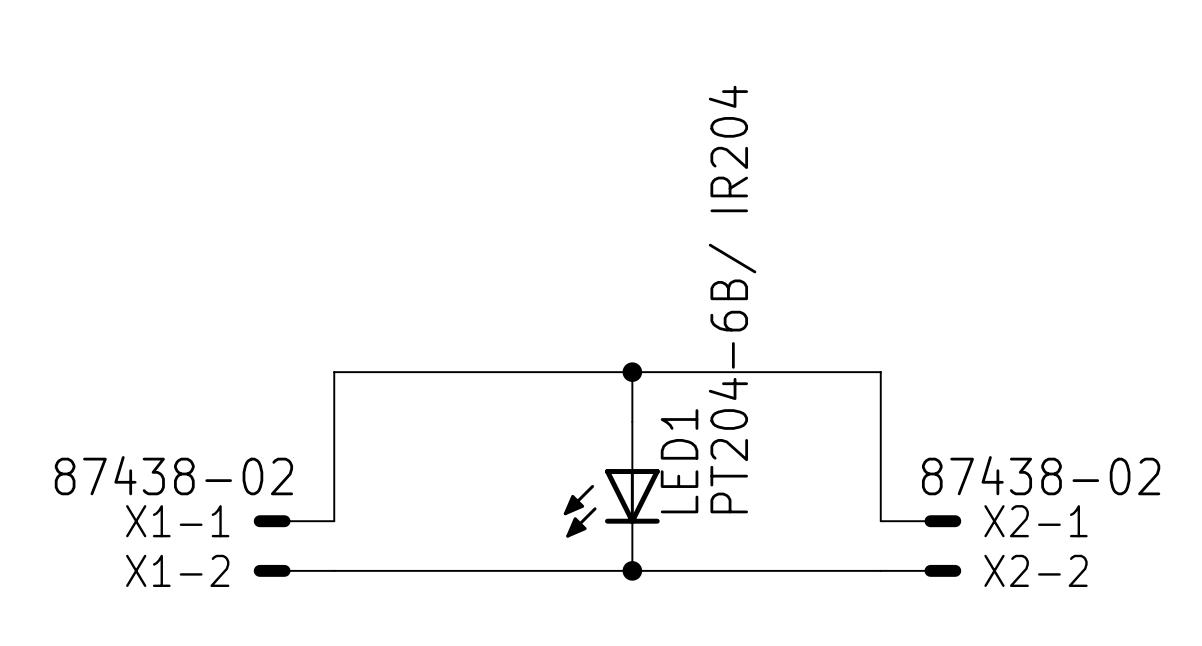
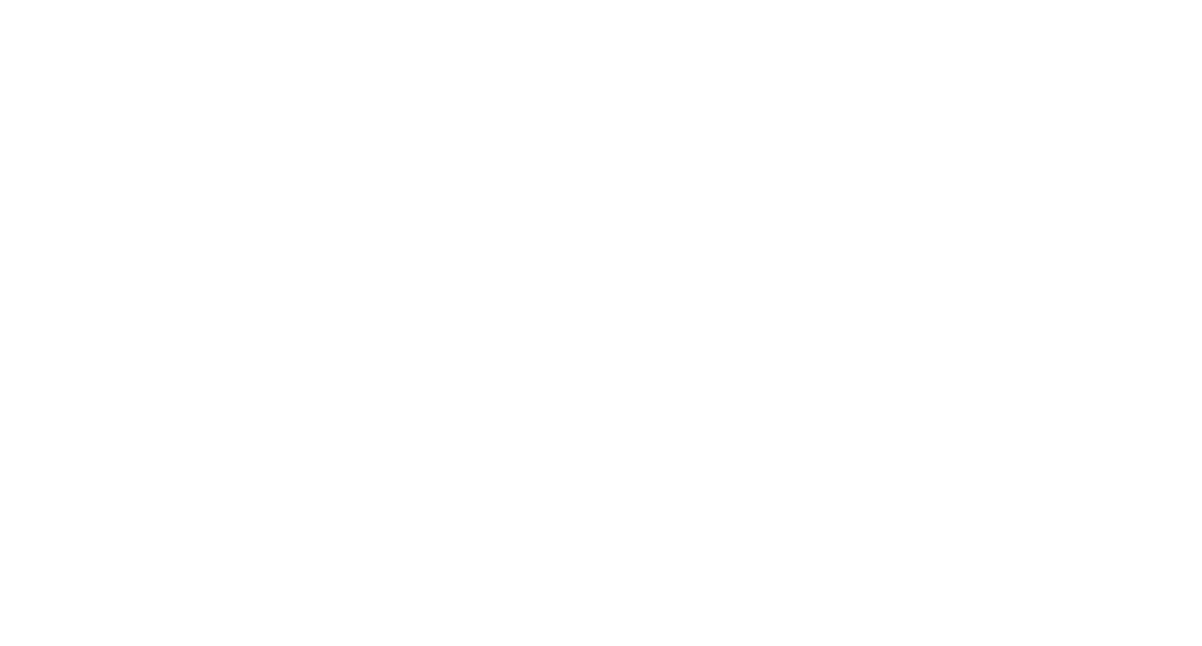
wire: (632, 372) (632, 421) -> none
junction: (632, 372) -> none
LED1: PT204-6B/ IR204 (611, 496) -> none
X1-1: 87438-02 (294, 521) -> none
wire: (334, 521) (334, 372) (880, 372) (880, 521) -> none
X2-1: 87438-02 (921, 521) -> none
X1-2: (294, 570) -> none
wire: (334, 570) (880, 570) -> none
junction: (632, 570) -> none
X2-2: (921, 570) -> none

